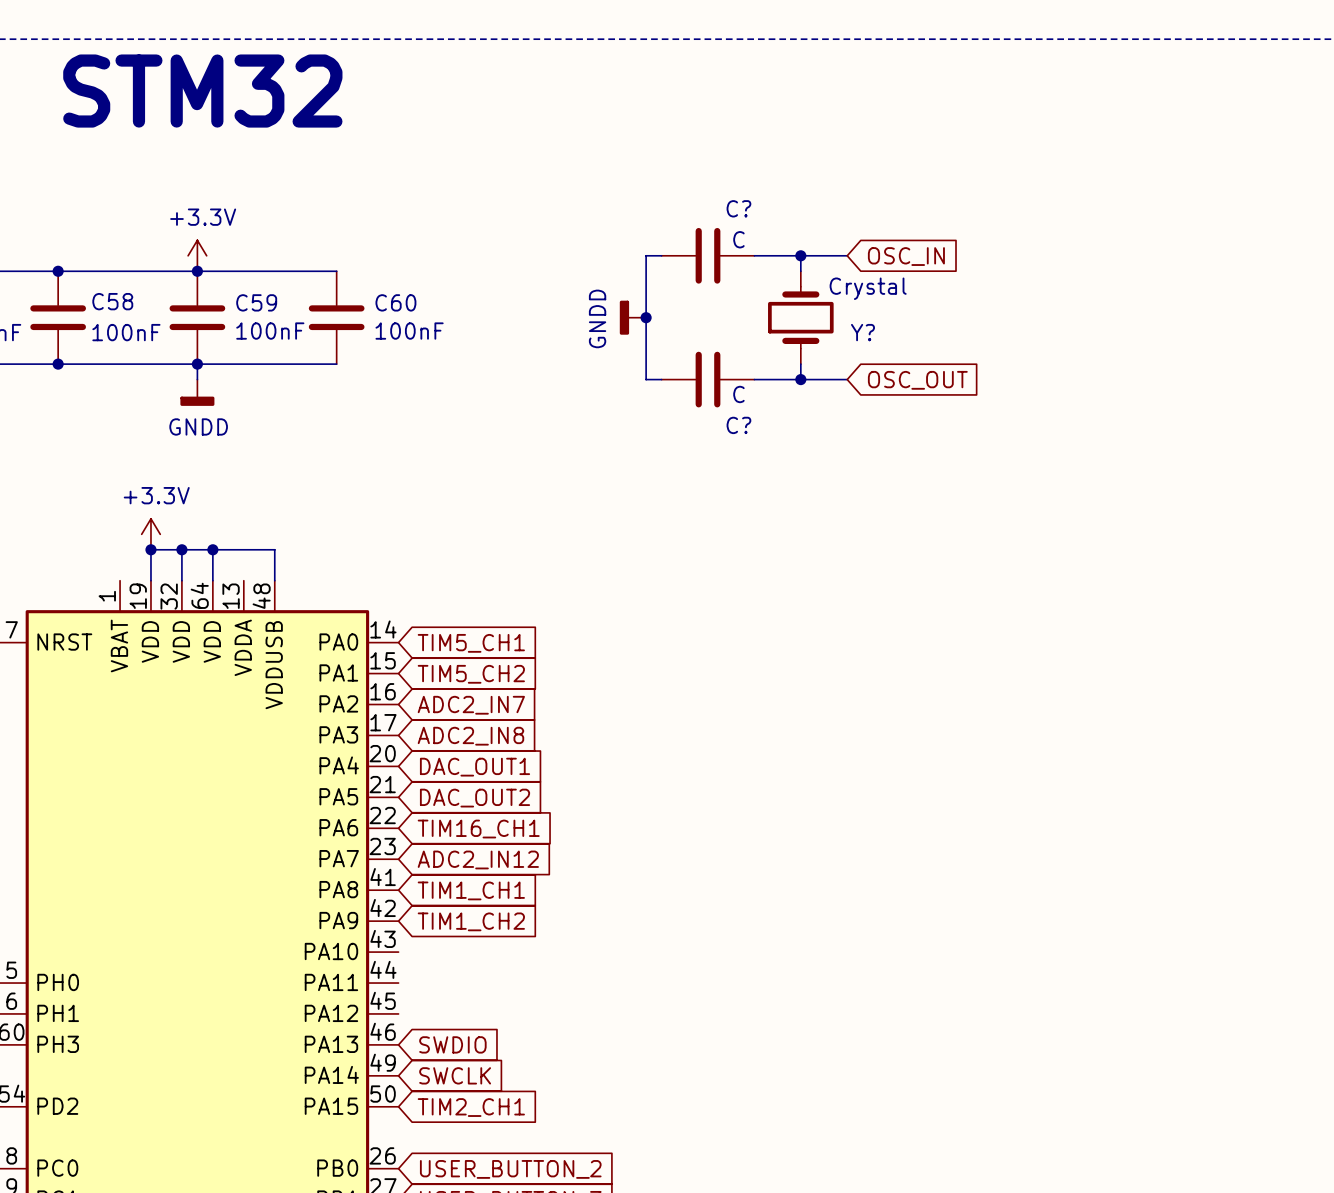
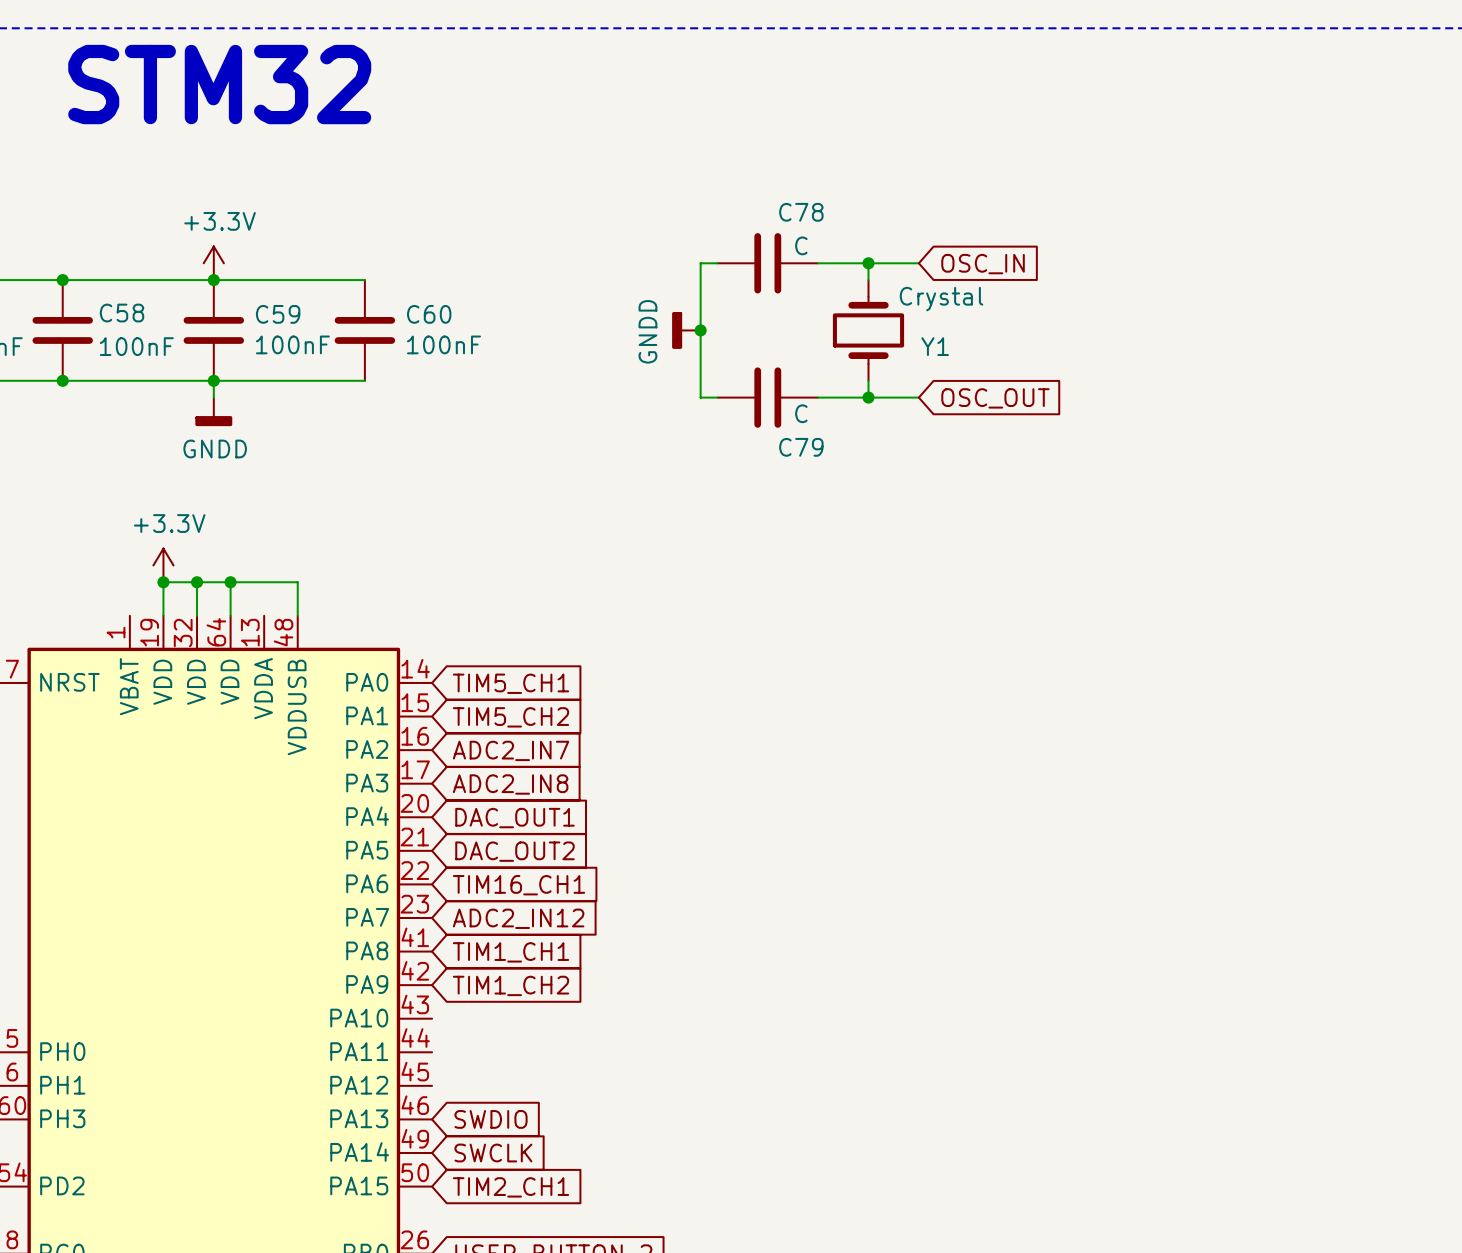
C? name: C? (738, 208) -> C78 (801, 212)
Y? name: Y? (862, 332) -> Y1 (935, 346)
C? name: C? (738, 425) -> C79 (801, 447)

